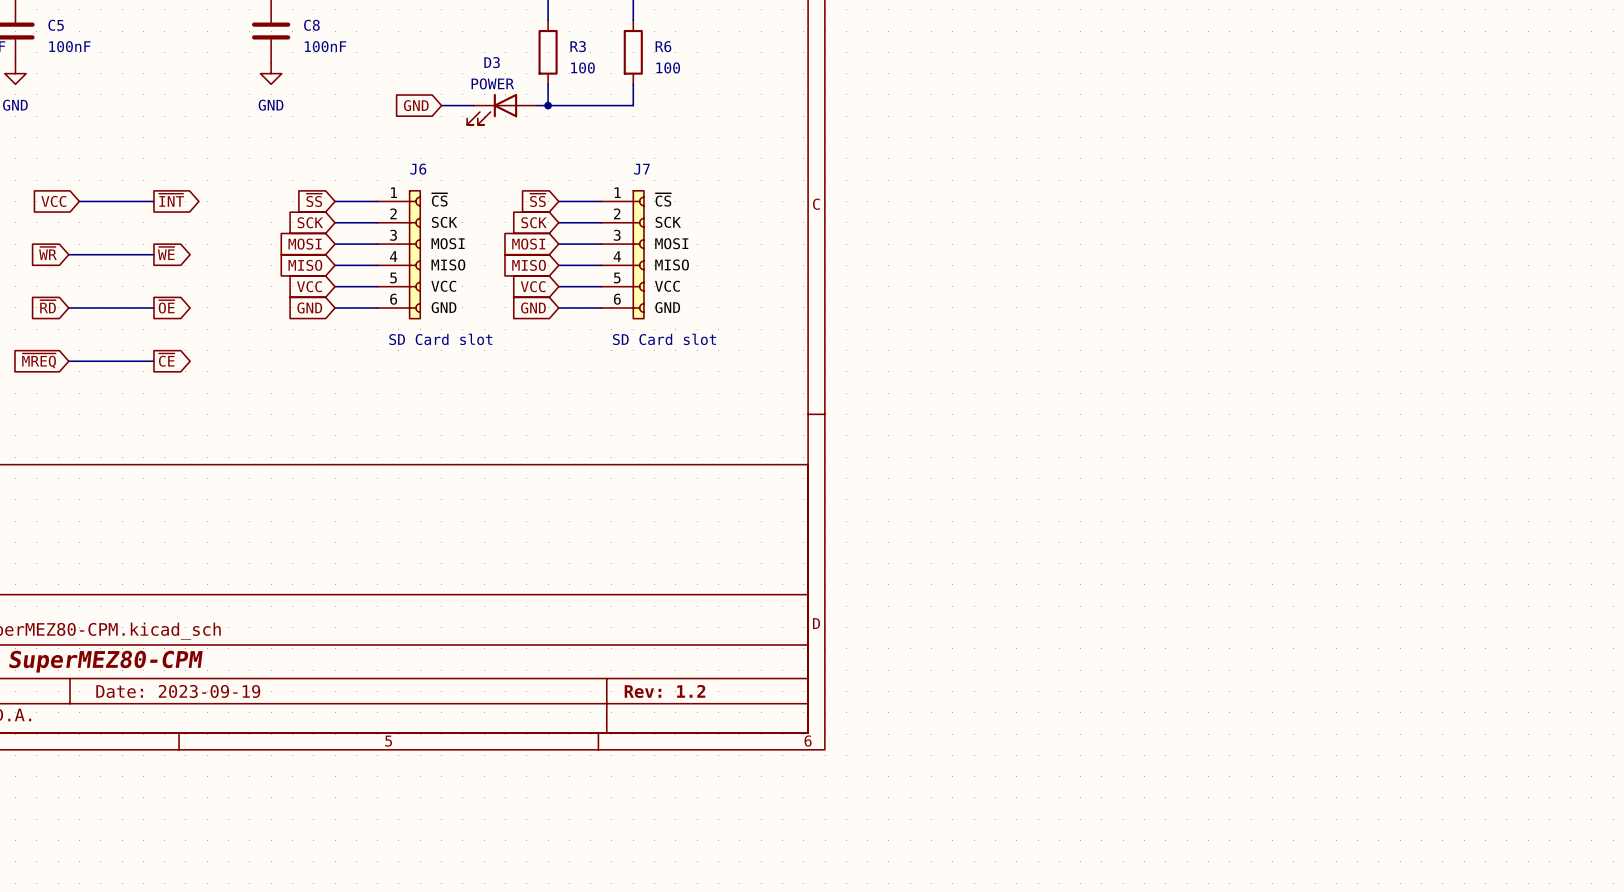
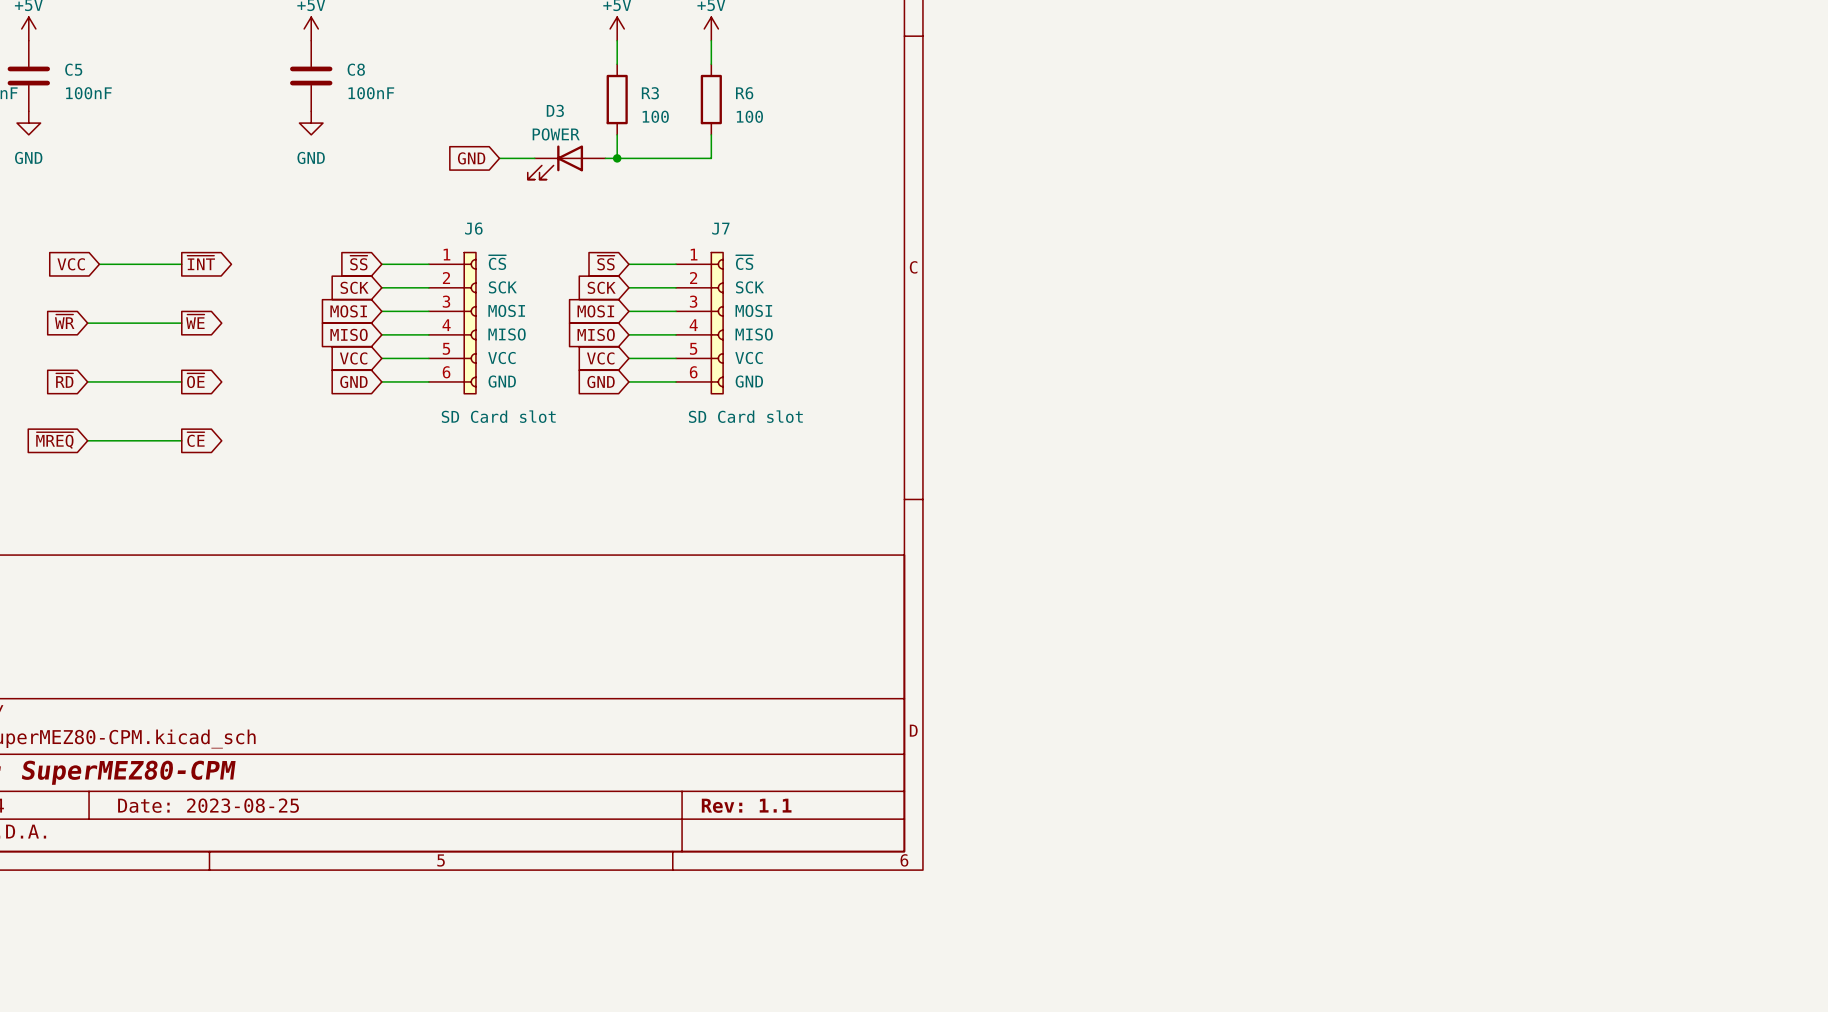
title block: Date: 2023-09-19 (178, 691) -> Date: 2023-08-25 (208, 805)
title block: Rev: 1.2 (664, 691) -> Rev: 1.1 (746, 805)

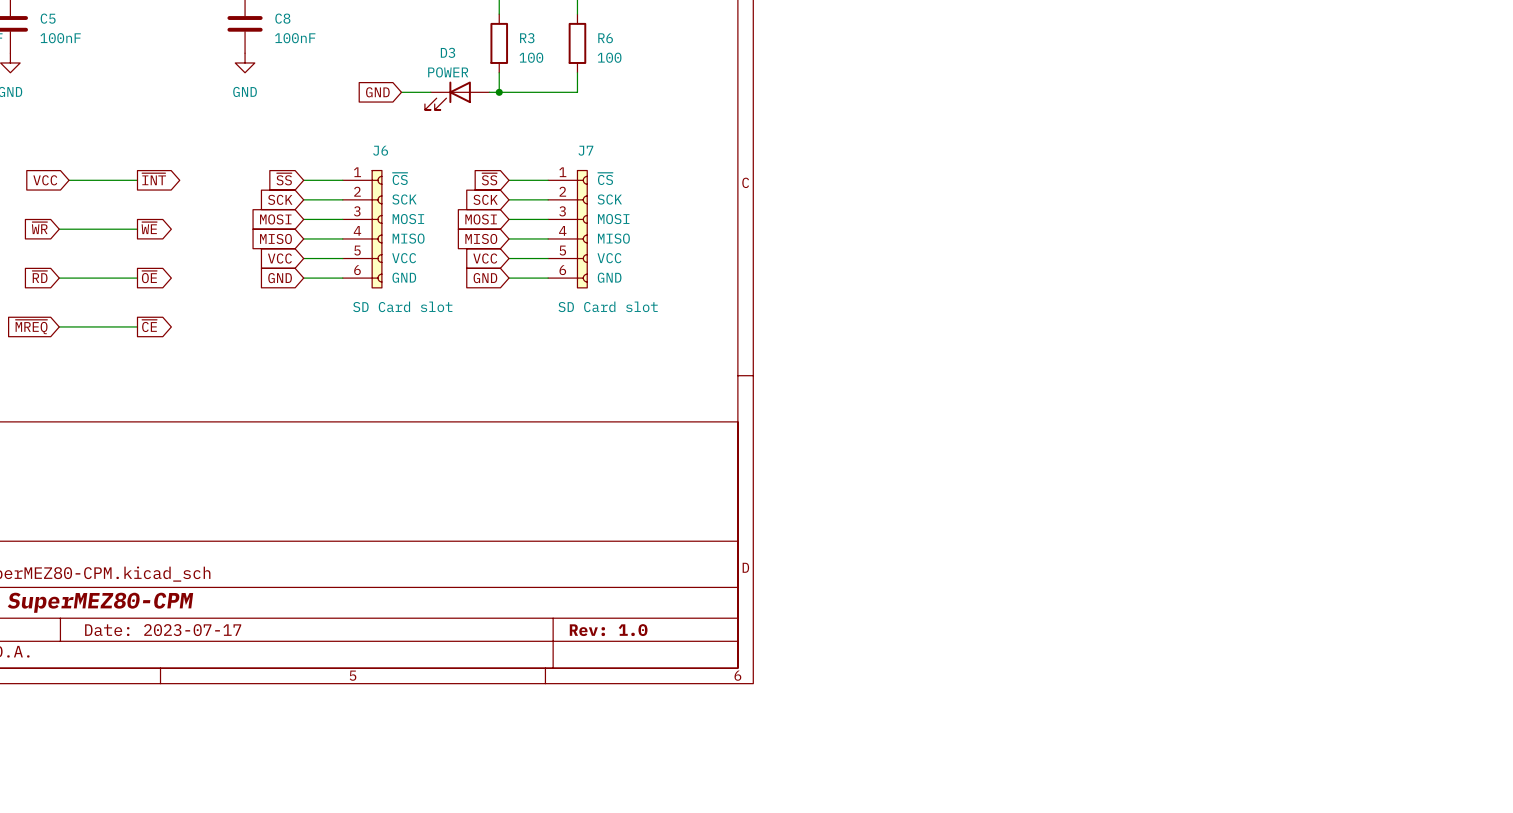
title block: Date: 2023-08-25 (208, 805) -> Date: 2023-07-17 (163, 630)
title block: Rev: 1.1 (746, 805) -> Rev: 1.0 (608, 630)

